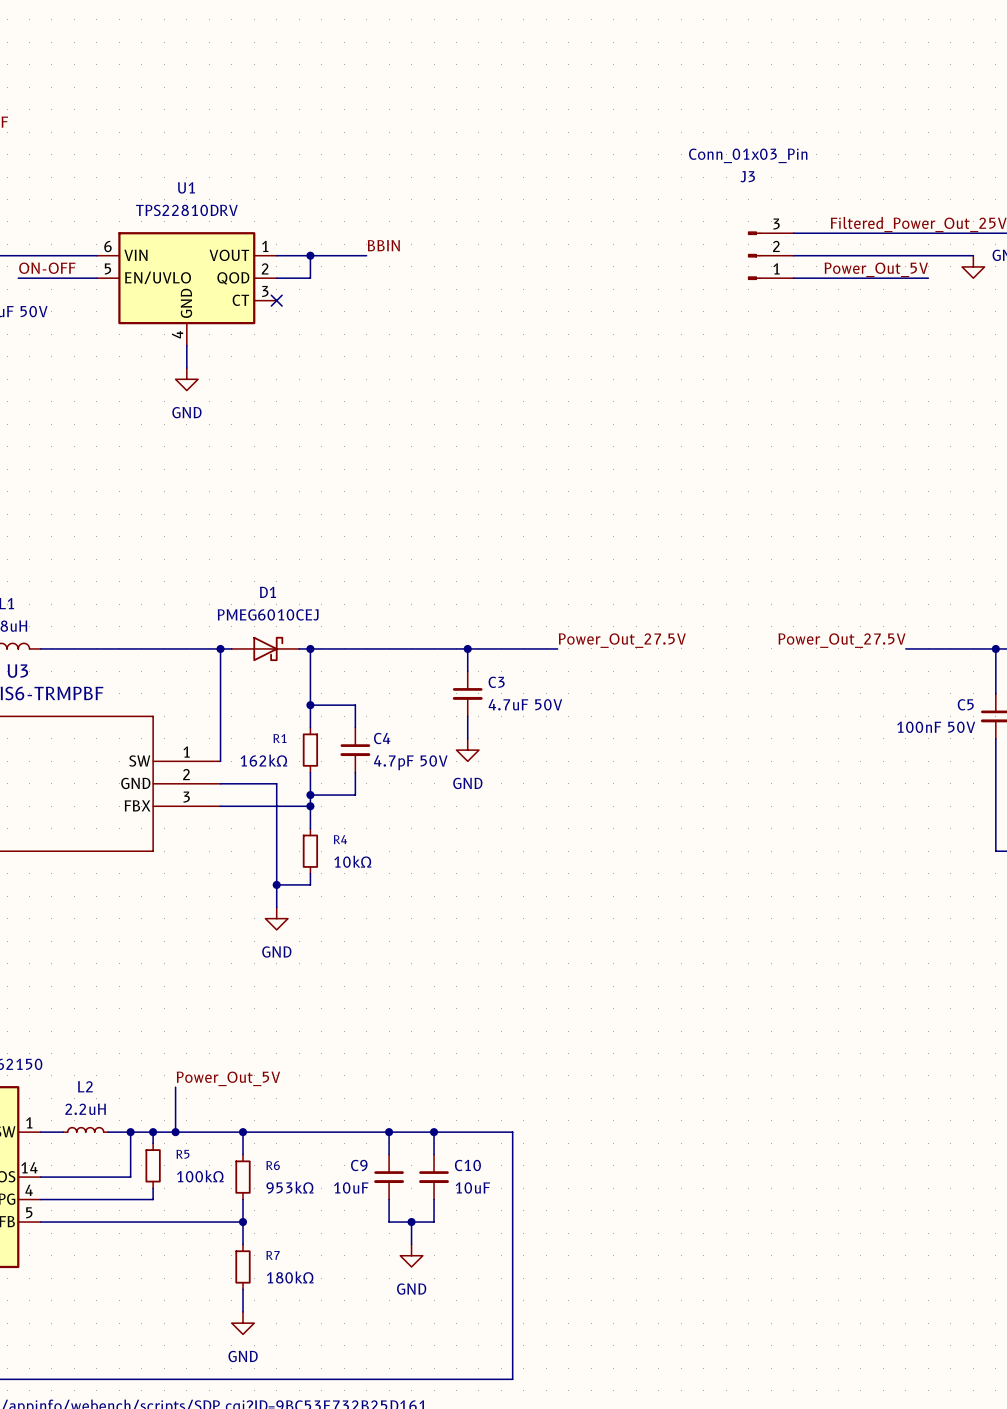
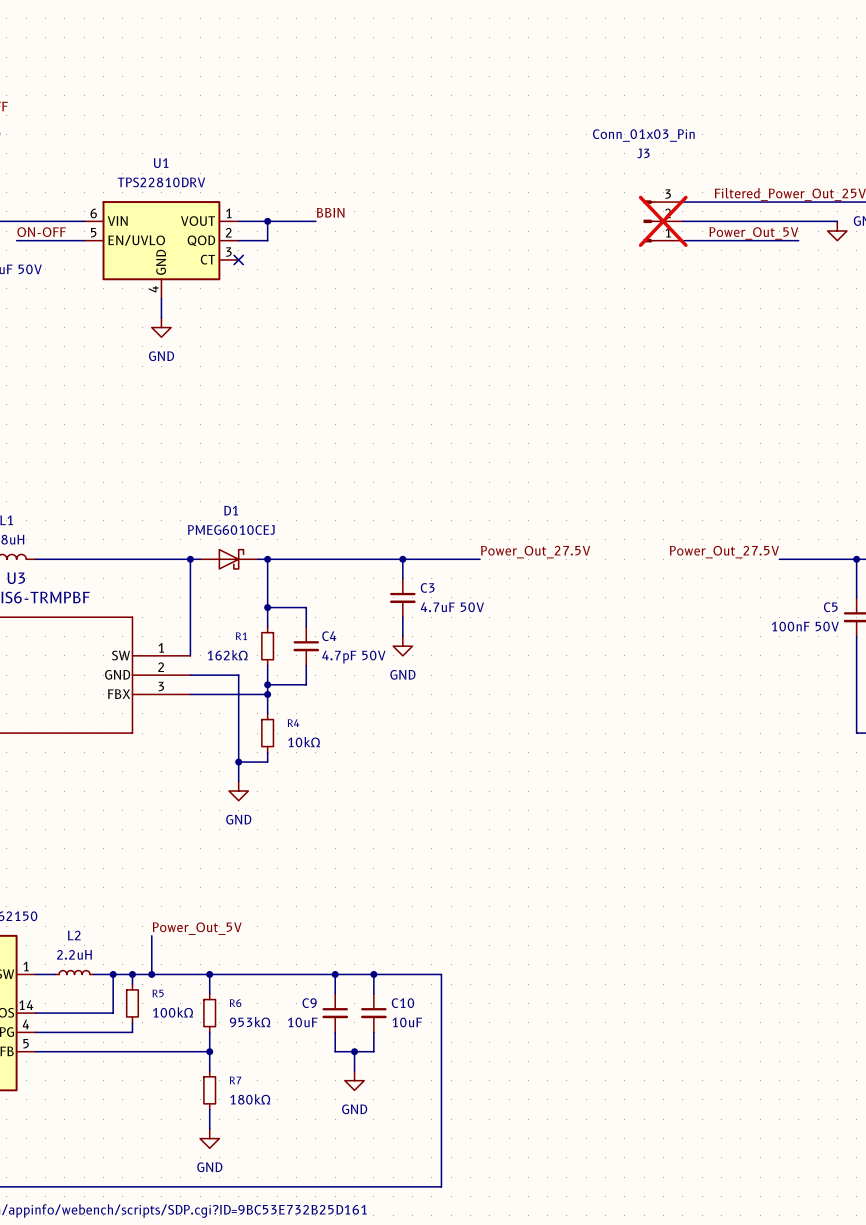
J3 do-not-place cross: none -> (663, 221)

